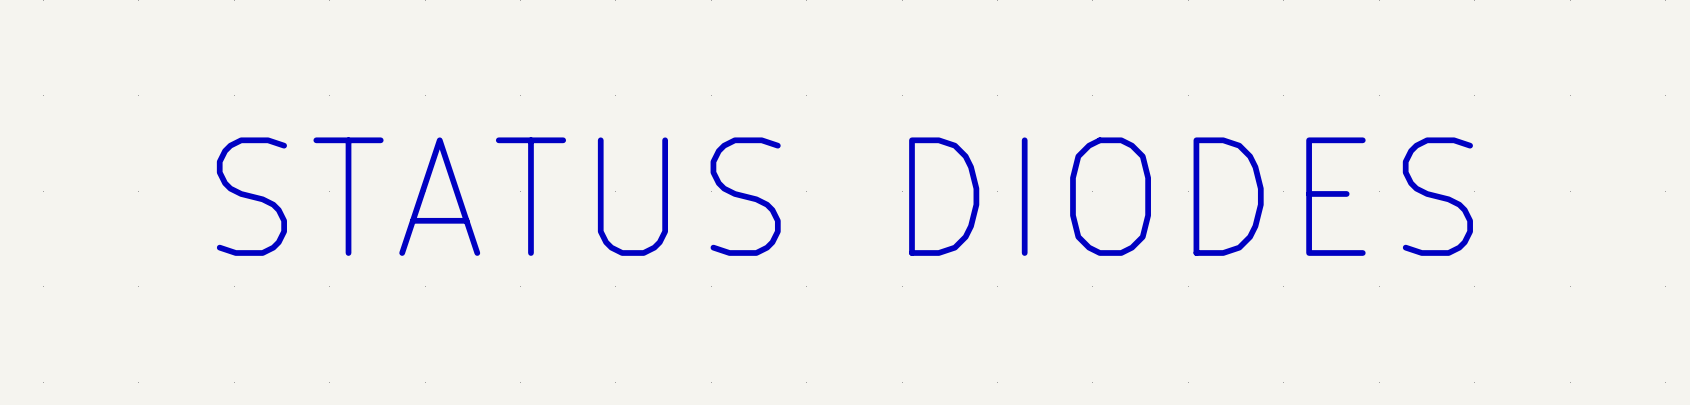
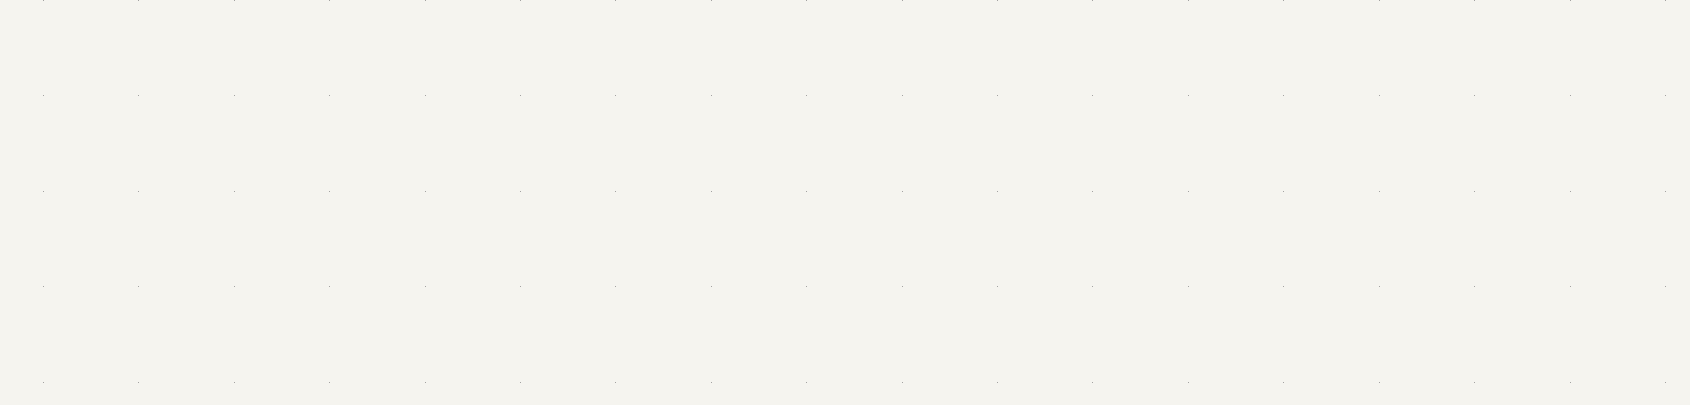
text: STATUS DIODES (844, 196) -> none

